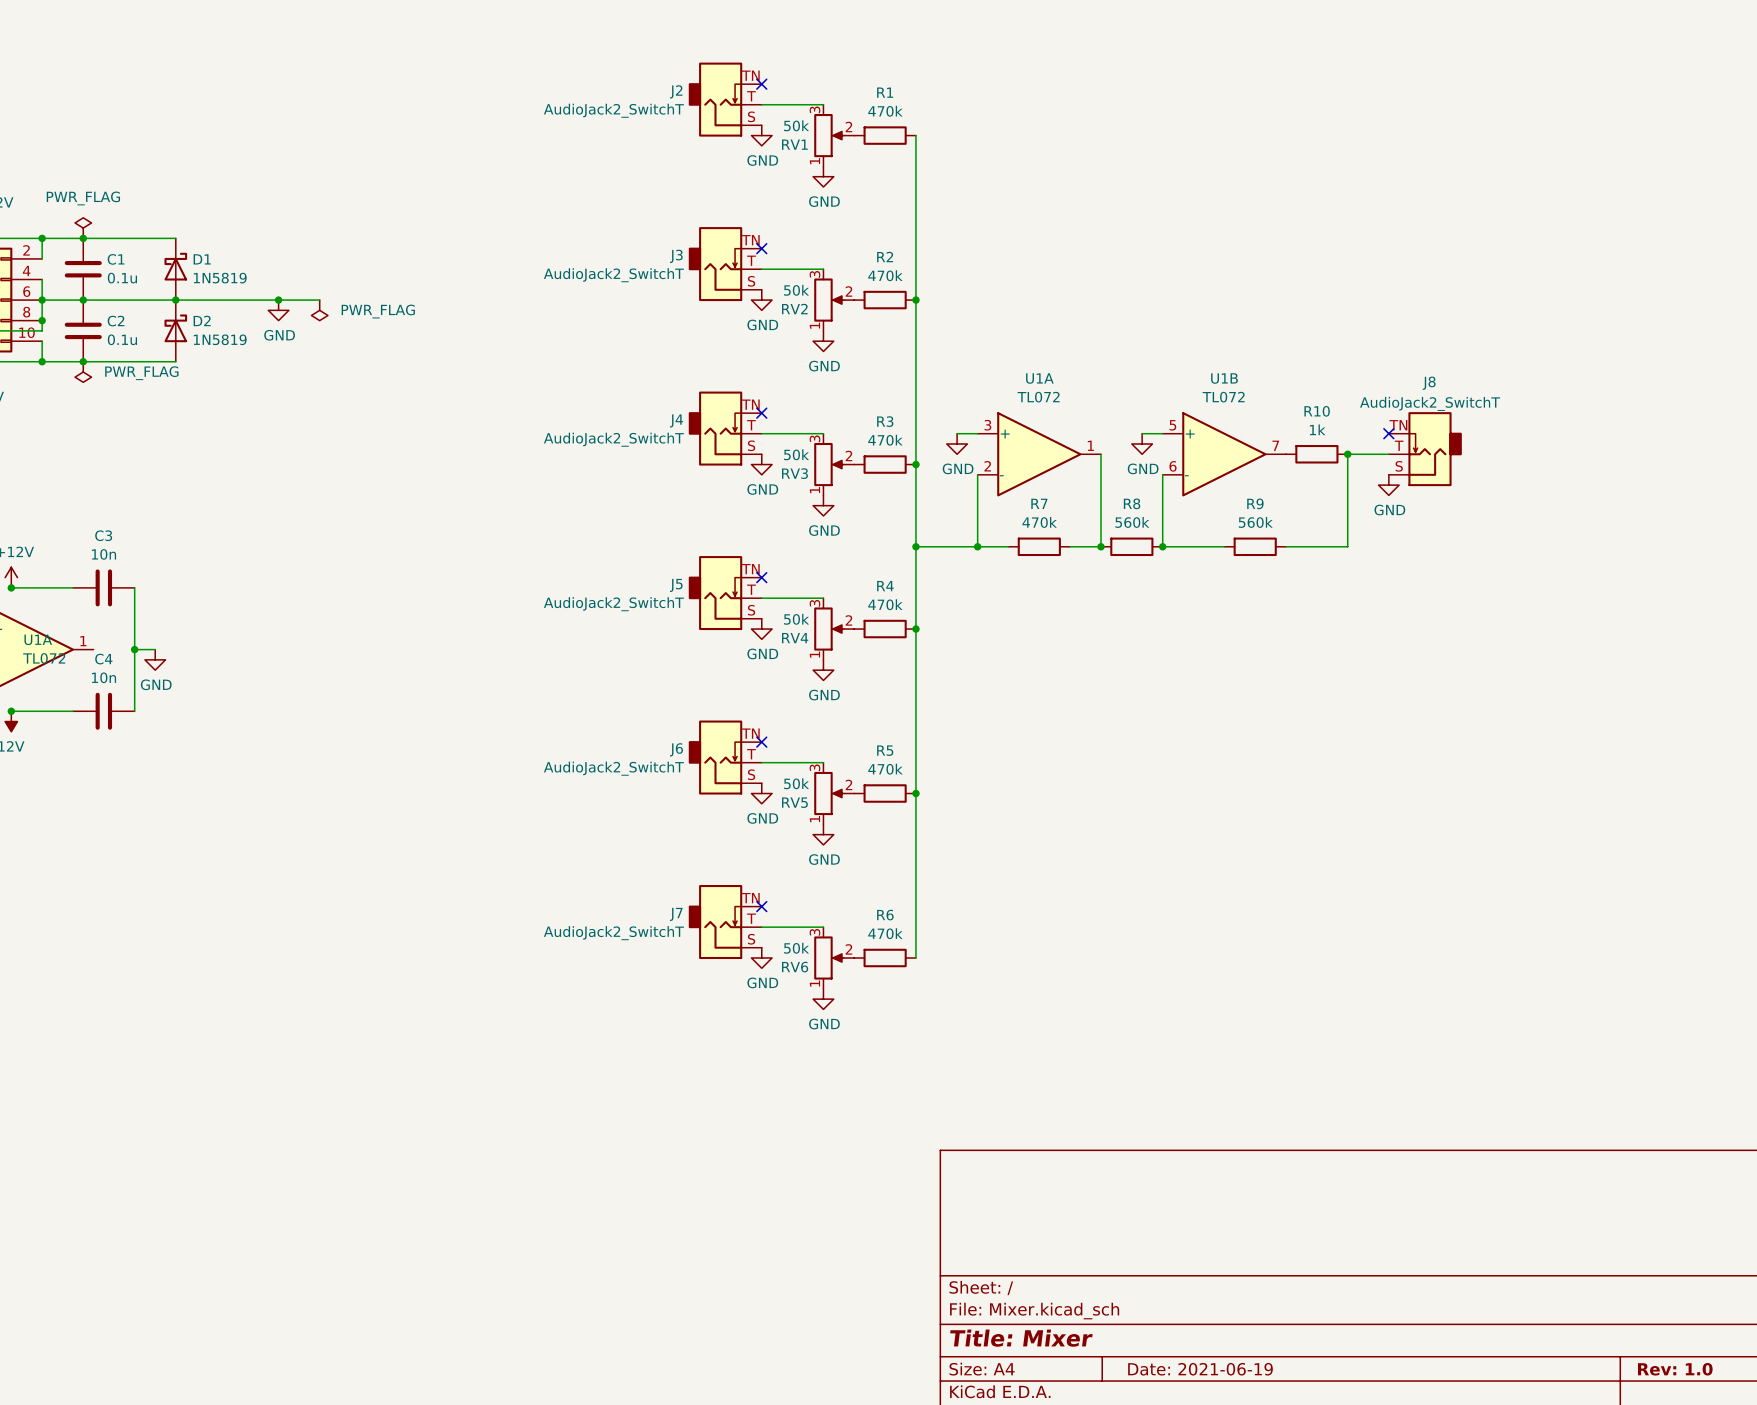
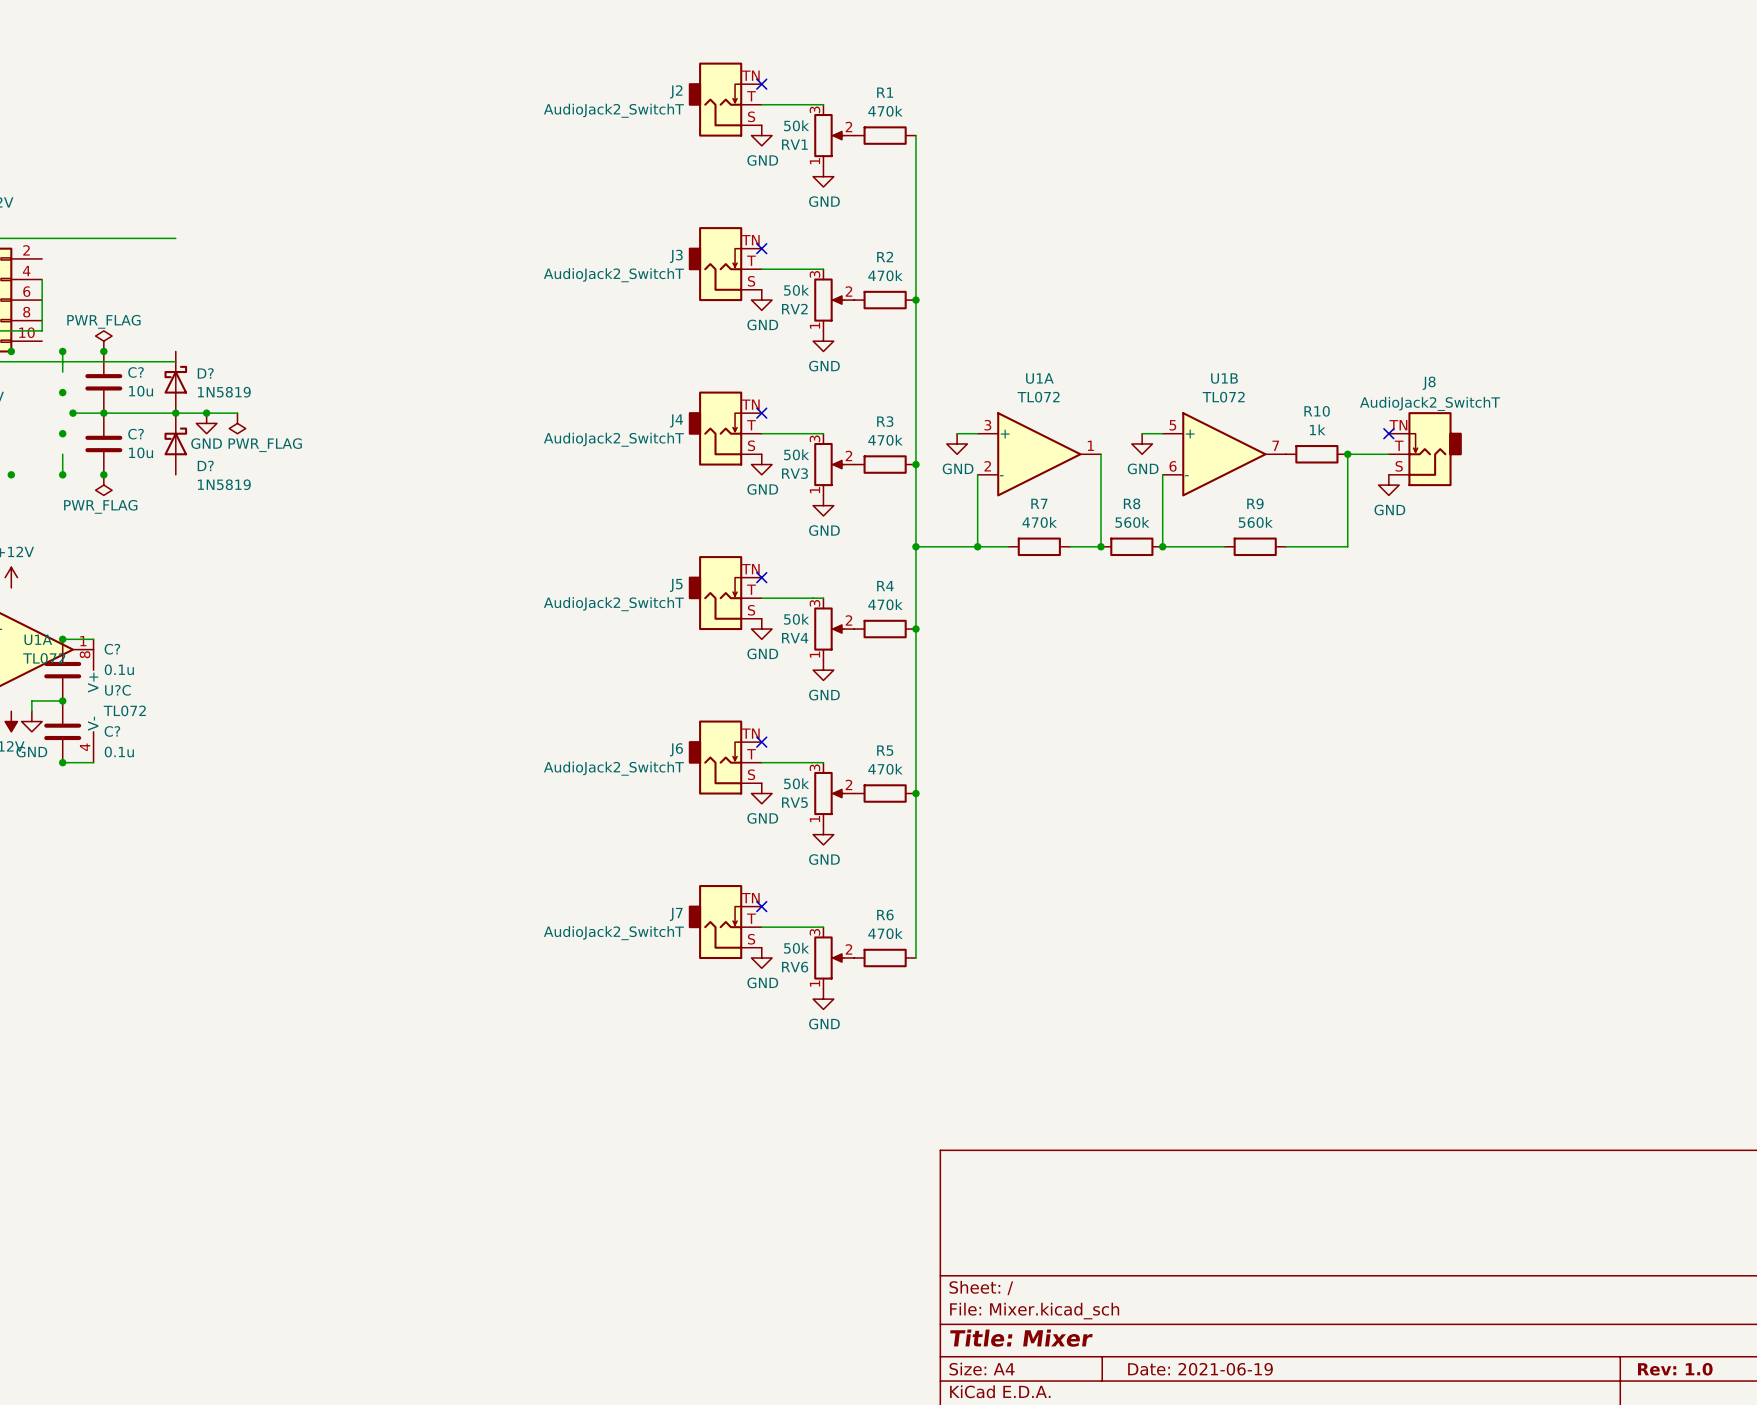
power symbol: PWR_FLAG (83, 228) -> none
wire: (42, 238) (42, 258) -> (62, 351) (62, 372)
junction: (42, 238) -> none
junction: (83, 238) -> none
C1: 0.1u (83, 269) -> none
D1: 1N5819 (175, 269) -> none
wire: (42, 300) (319, 300) -> none
junction: (42, 300) -> none
junction: (83, 300) -> none
junction: (175, 300) -> none
junction: (278, 300) -> none
power symbol: GND (278, 310) -> none
power symbol: PWR_FLAG (319, 310) -> none
junction: (42, 320) -> none
C2: 0.1u (83, 330) -> none
D2: 1N5819 (175, 330) -> none
wire: (42, 341) (42, 361) -> (62, 454) (62, 474)
junction: none -> (11, 351)
junction: none -> (62, 351)
junction: none -> (103, 351)
junction: (42, 361) -> none
junction: (83, 361) -> none
power symbol rotation: 0° (83, 372) -> 180° (103, 341)
power symbol position: PWR_FLAG (83, 372) -> PWR_FLAG (103, 341)
power symbol text position: PWR_FLAG (141, 373) -> PWR_FLAG (103, 321)
C?: none -> 10u (103, 382)
D?: none -> 1N5819 (175, 382)
junction: none -> (62, 392)
wire: none -> (72, 413) (237, 413)
junction: none -> (72, 413)
junction: none -> (103, 413)
junction: none -> (175, 413)
junction: none -> (206, 413)
power symbol: none -> GND (206, 423)
power symbol: none -> PWR_FLAG (237, 423)
junction: none -> (62, 433)
C?: none -> 10u (103, 443)
D?: none -> 1N5819 (175, 443)
junction: none -> (11, 474)
junction: none -> (62, 474)
junction: none -> (103, 474)
power symbol: none -> PWR_FLAG (103, 485)
wire: (11, 587) (72, 587) -> none
junction: (11, 587) -> none
C3: 10n (103, 587) -> none
wire: (134, 587) (134, 711) -> none
wire: none -> (62, 639) (93, 639)
junction: none -> (62, 639)
wire: (134, 649) (155, 649) -> none
junction: (134, 649) -> none
power symbol: GND (155, 659) -> none
C?: none -> 0.1u (62, 670)
wire: none -> (62, 700) (31, 700) (31, 711)
junction: none -> (62, 700)
U?C: none -> TL072 (93, 700)
wire: (11, 711) (72, 711) -> none
junction: (11, 711) -> none
C4: 10n (103, 711) -> none
power symbol: none -> GND (31, 721)
C?: none -> 0.1u (62, 731)
wire: none -> (62, 762) (93, 762)
junction: none -> (62, 762)

